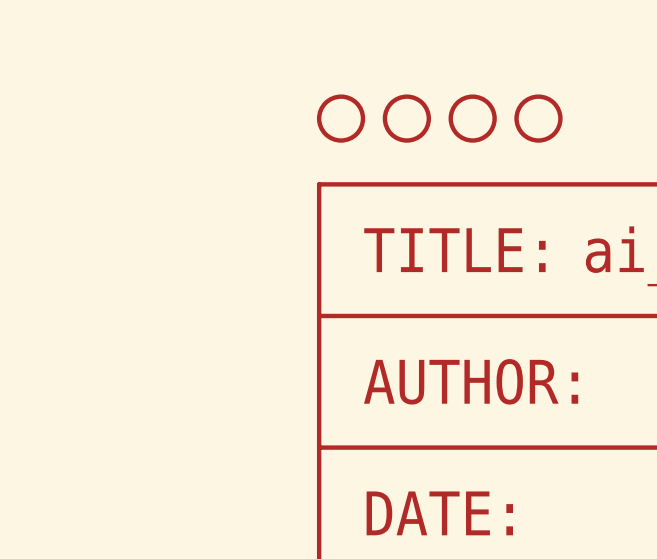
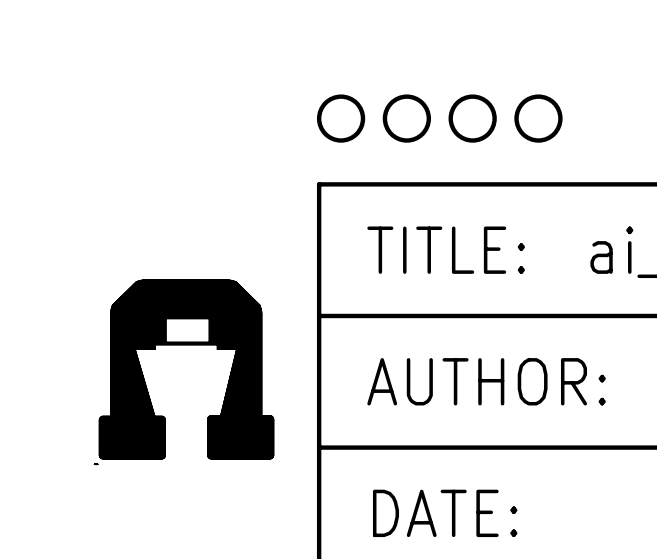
part: none -> (186, 369)

